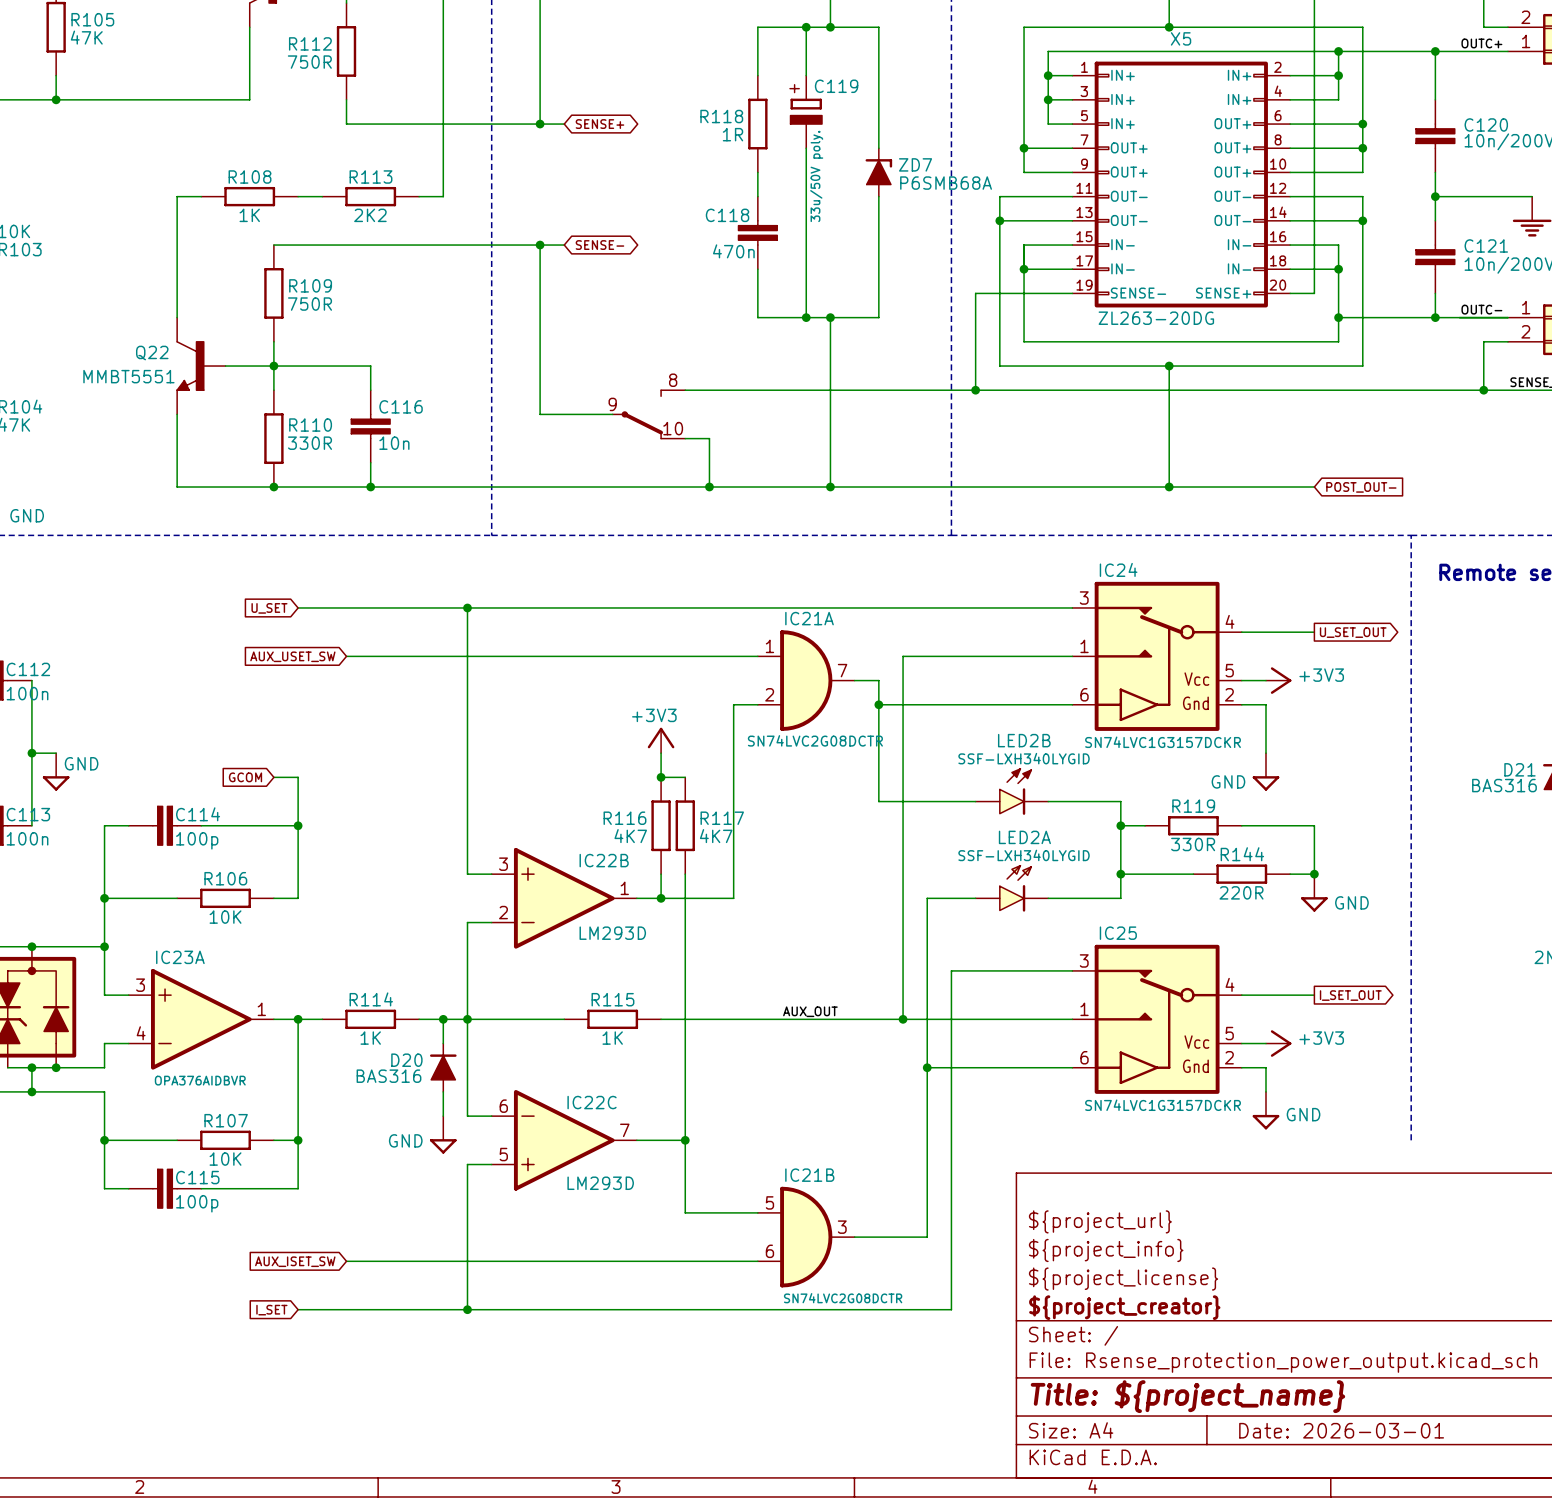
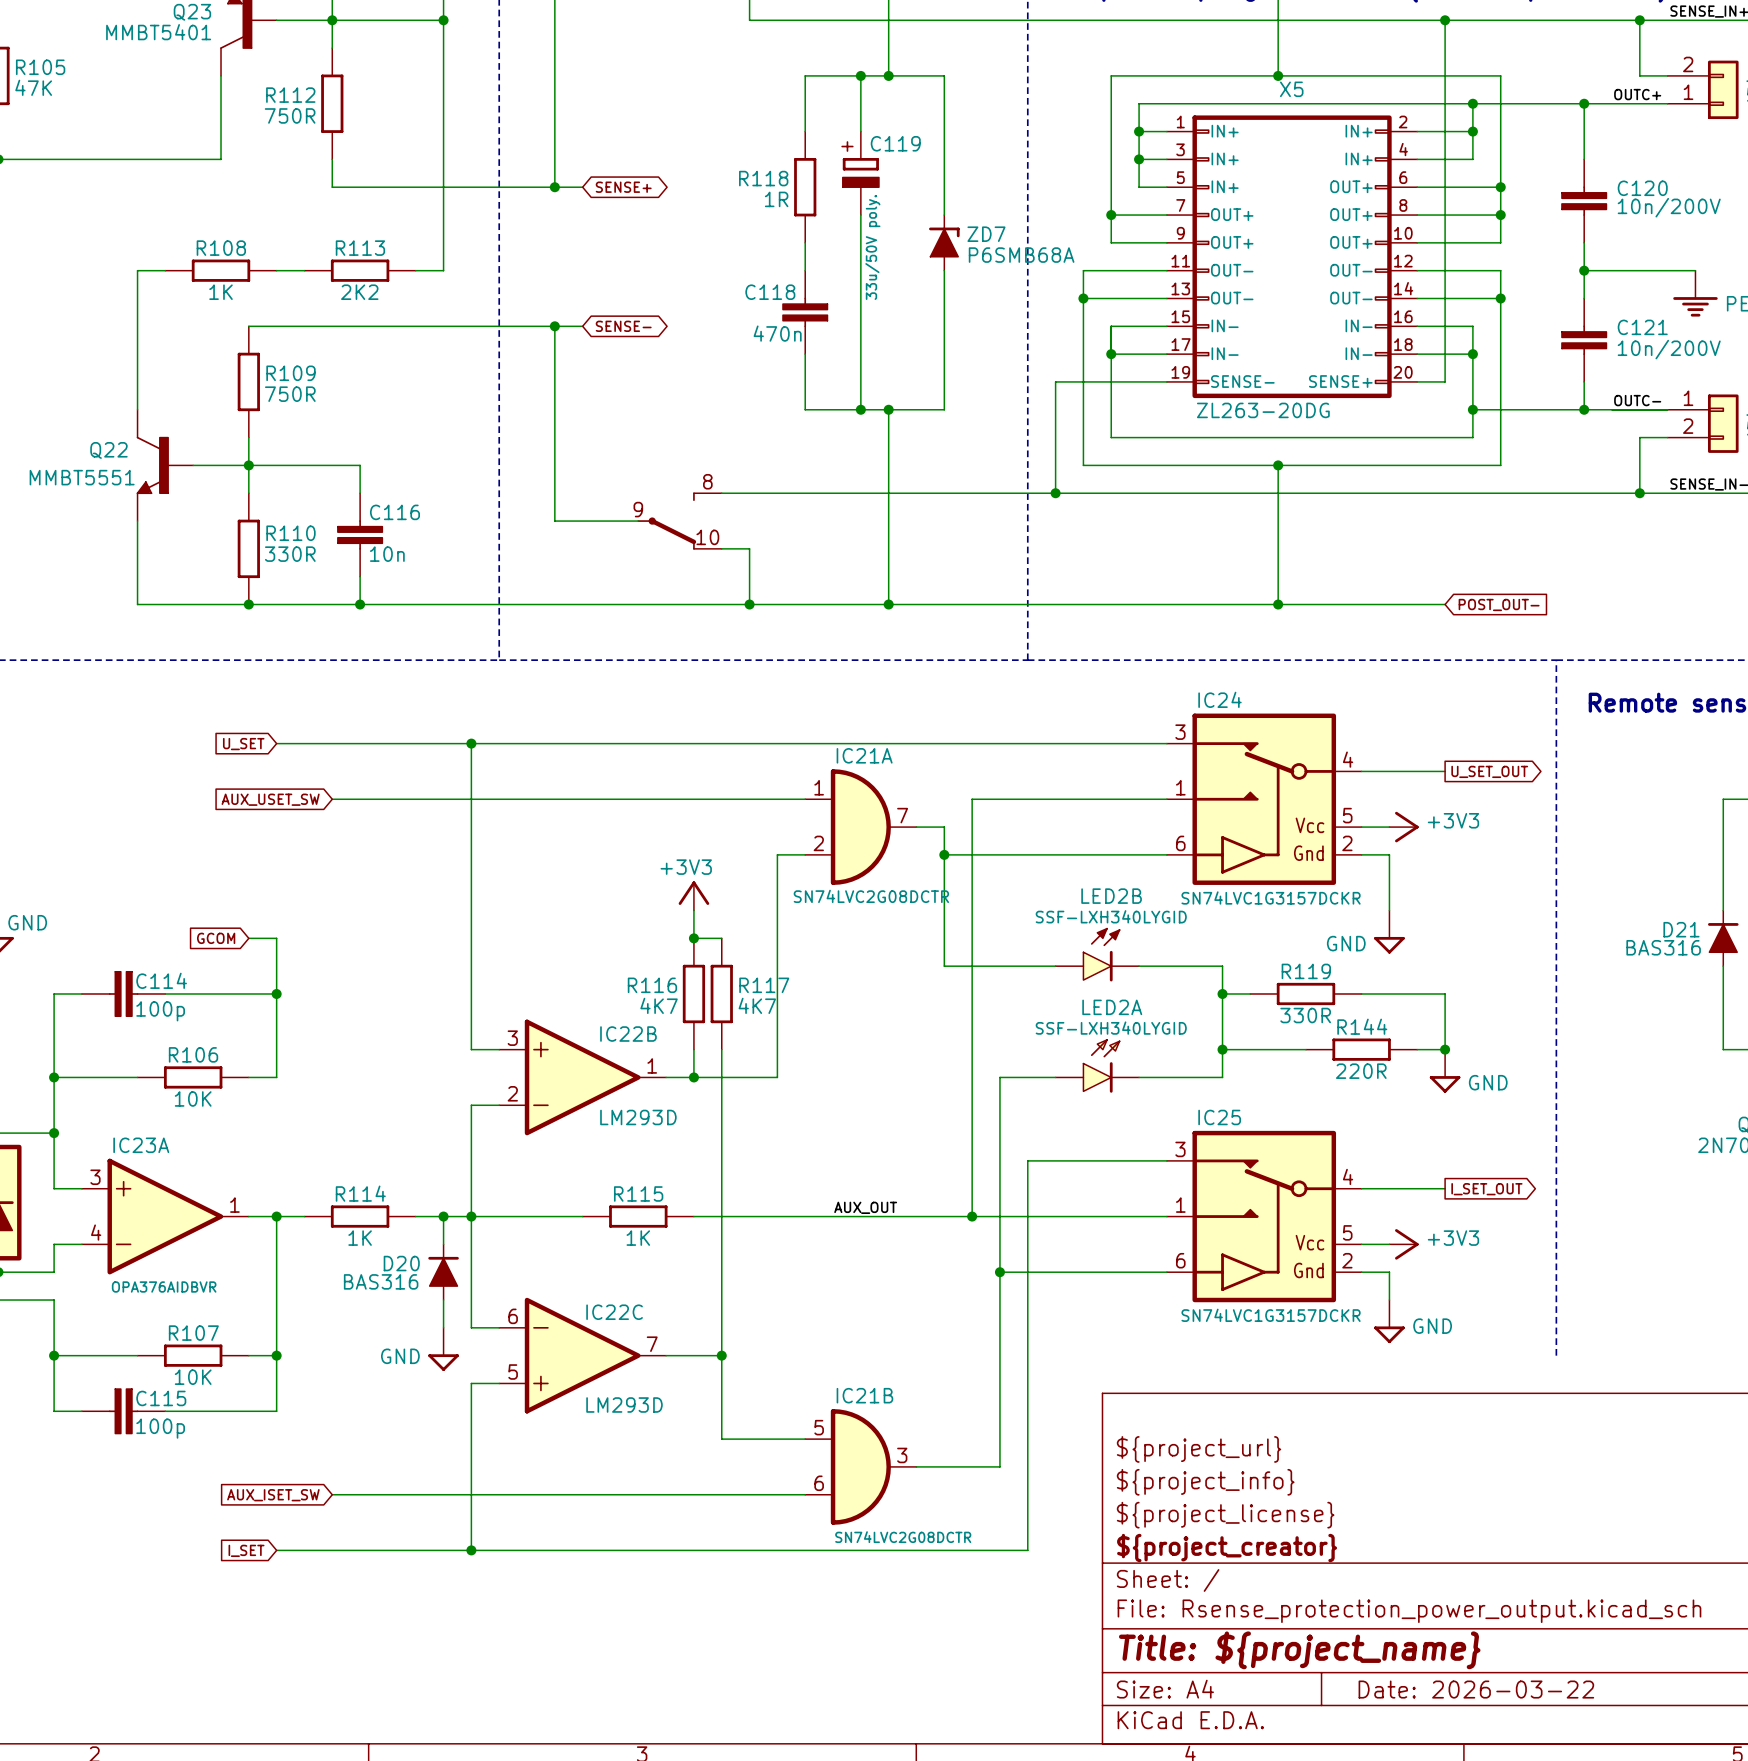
title block: Date: 2026-03-01 (1341, 1430) -> Date: 2026-03-22 (1476, 1689)

